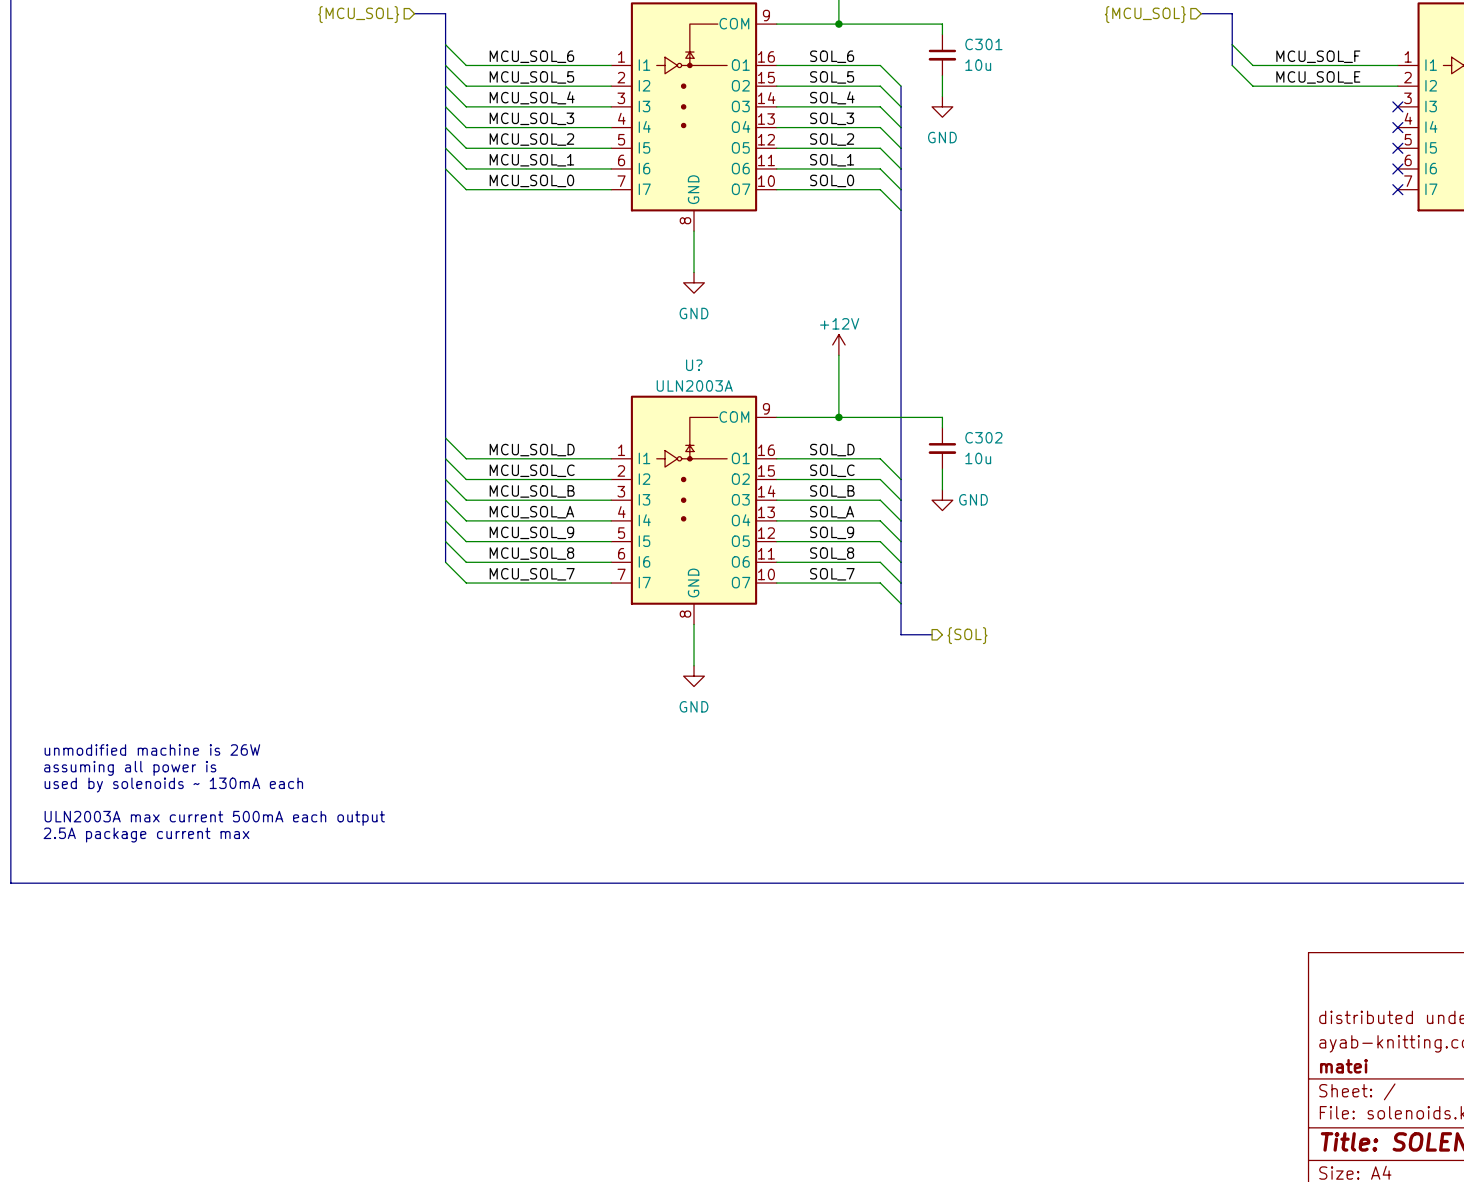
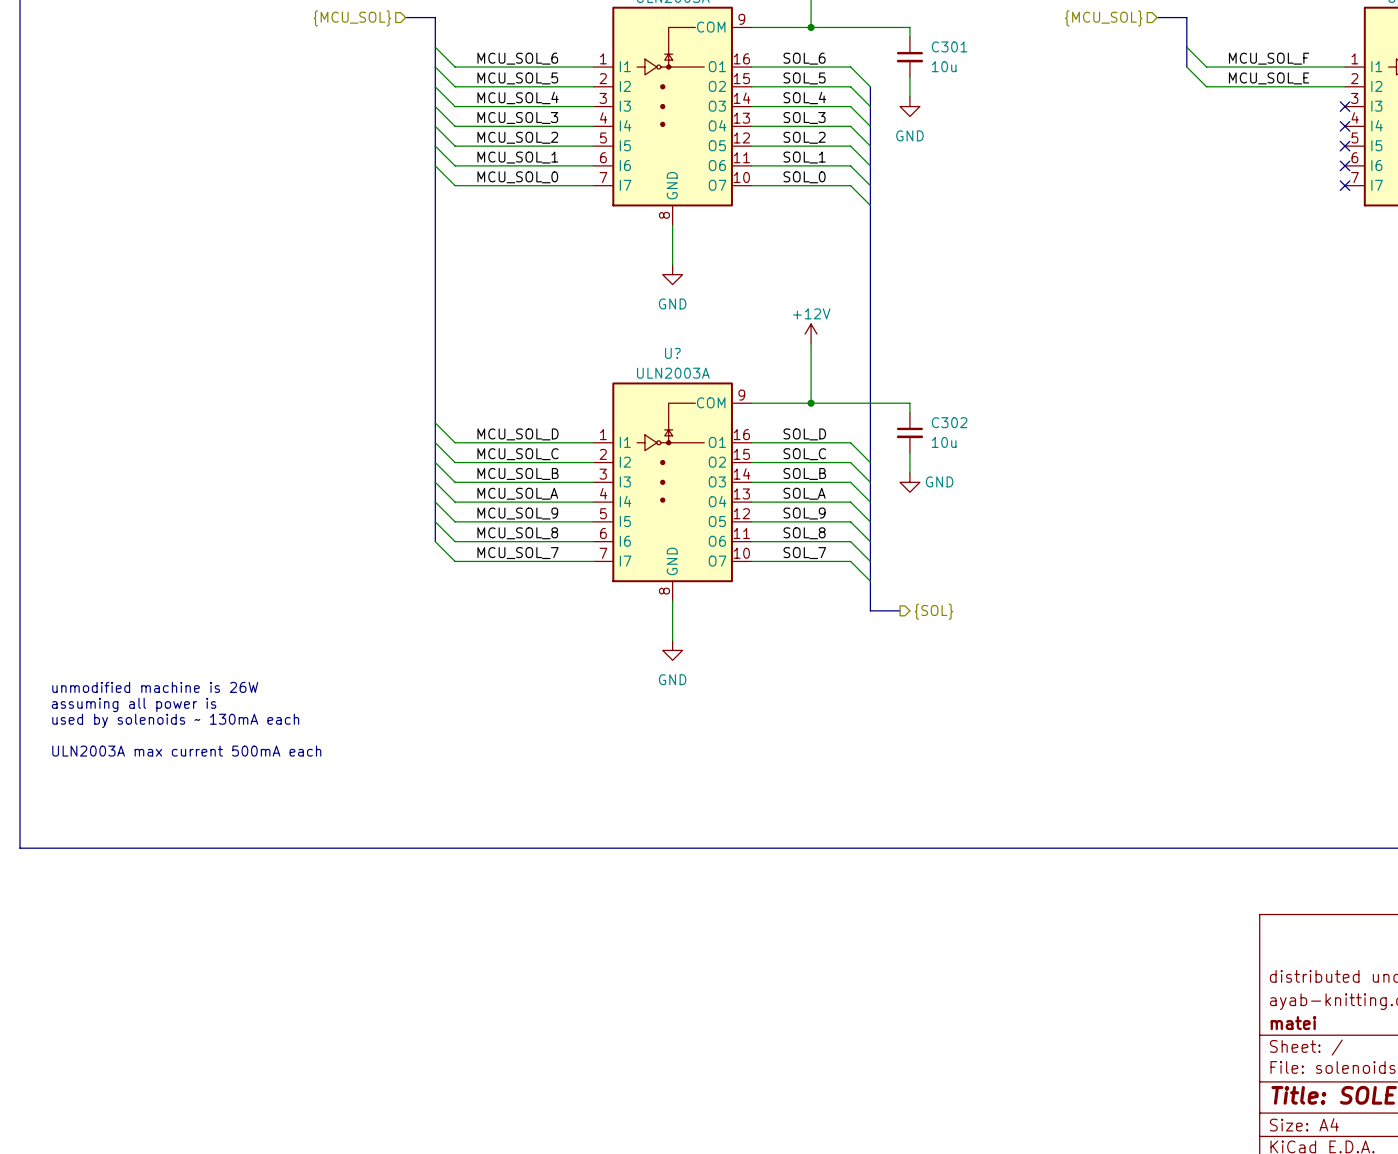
text: none -> unmodified machine is 26W (155, 687)
text: unmodified machine is 26W (152, 749) -> used by solenoids ~ 130mA each (175, 720)
text position: assuming all power is (130, 768) -> assuming all power is (134, 704)
text: used by solenoids ~ 130mA each (173, 785) -> ULN2003A max current 500mA each (186, 751)
text: ULN2003A max current 500mA each output (214, 818) -> none
text: 2.5A package current max (146, 835) -> none

